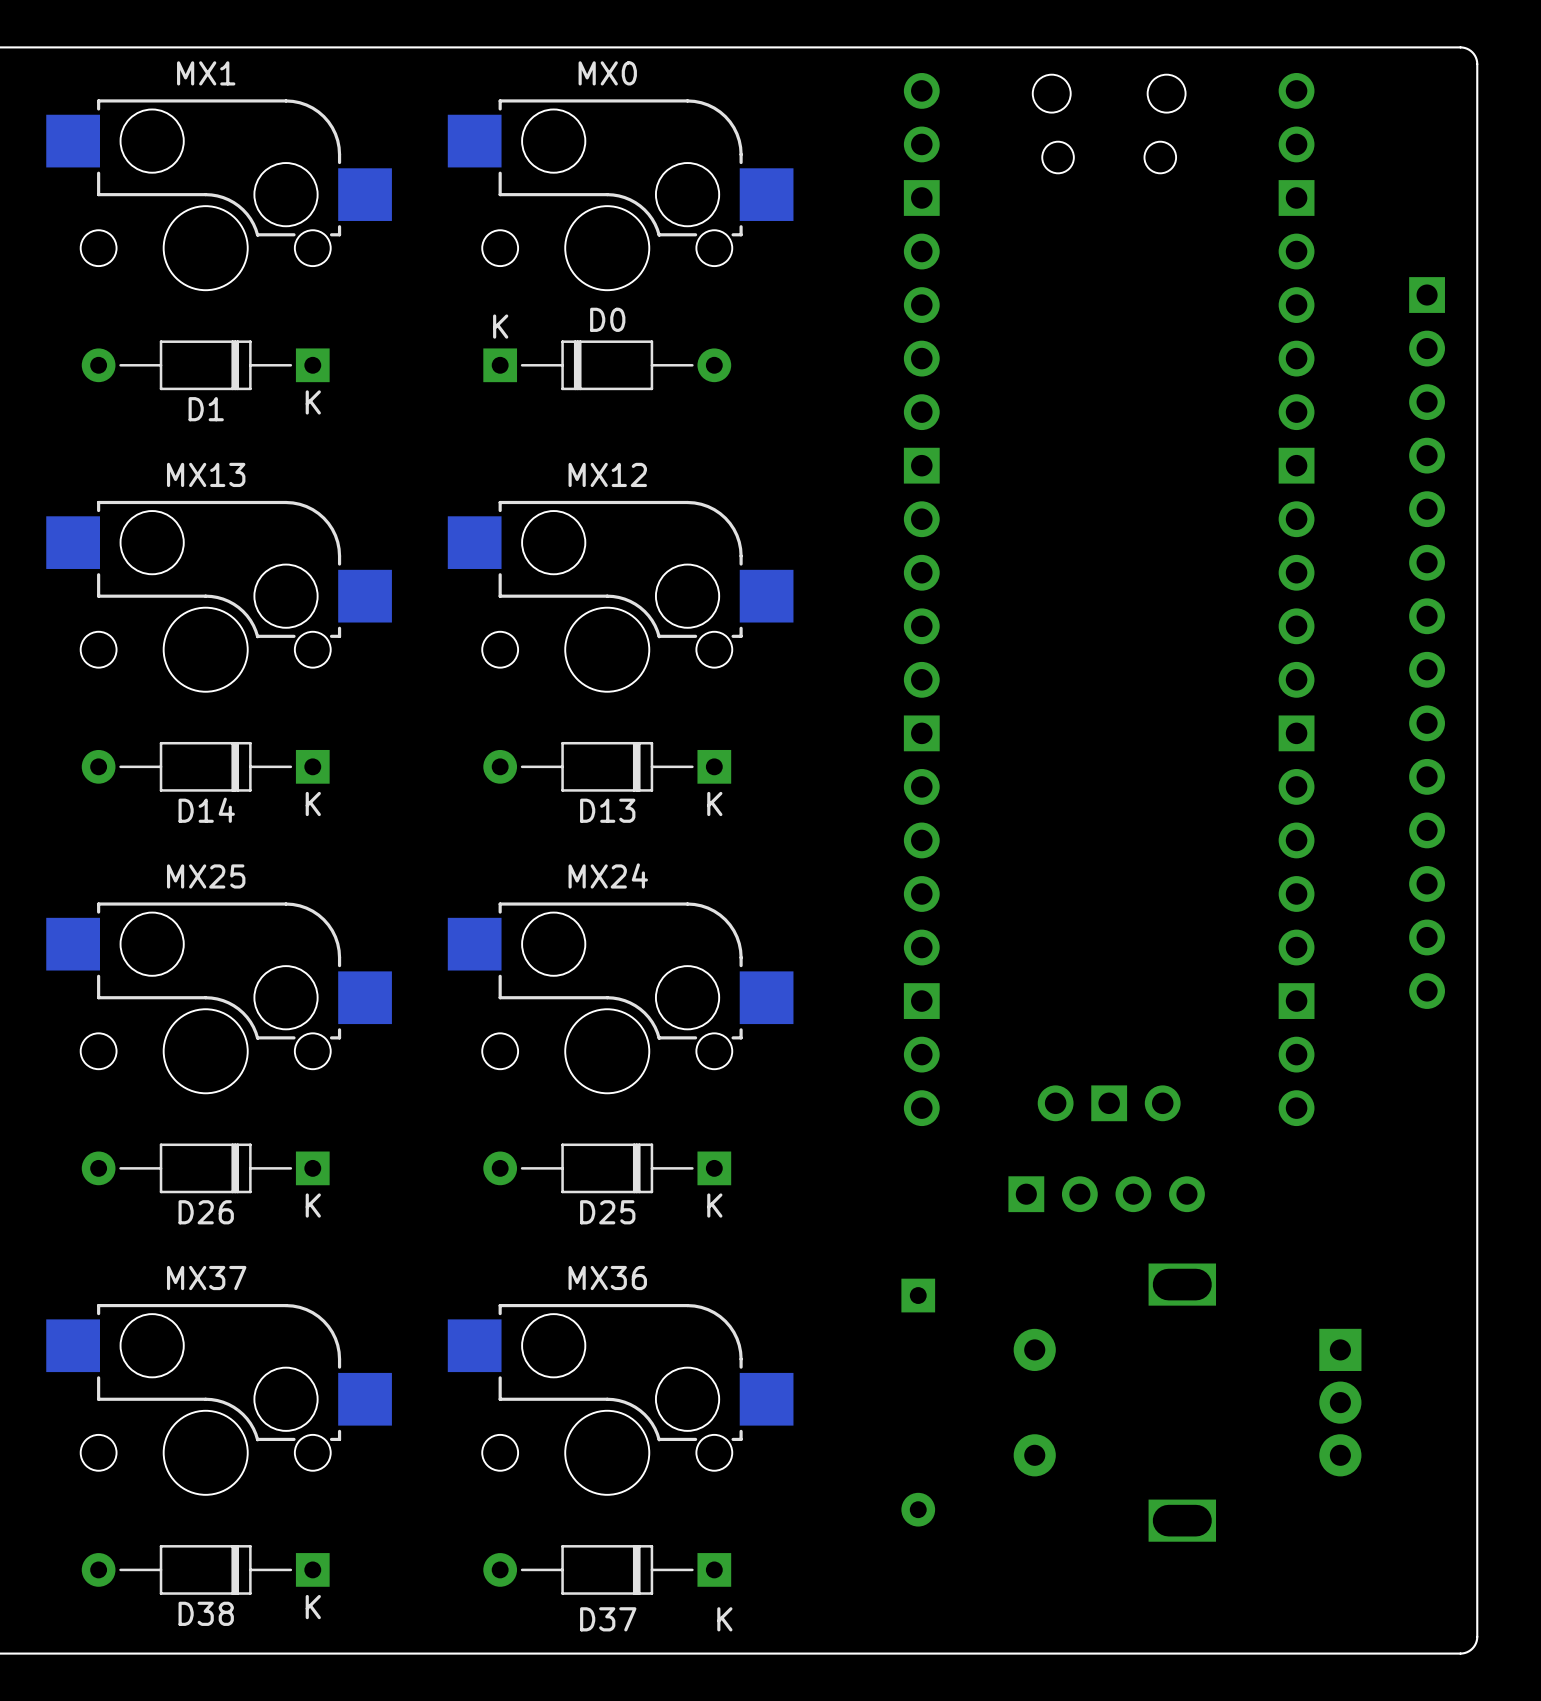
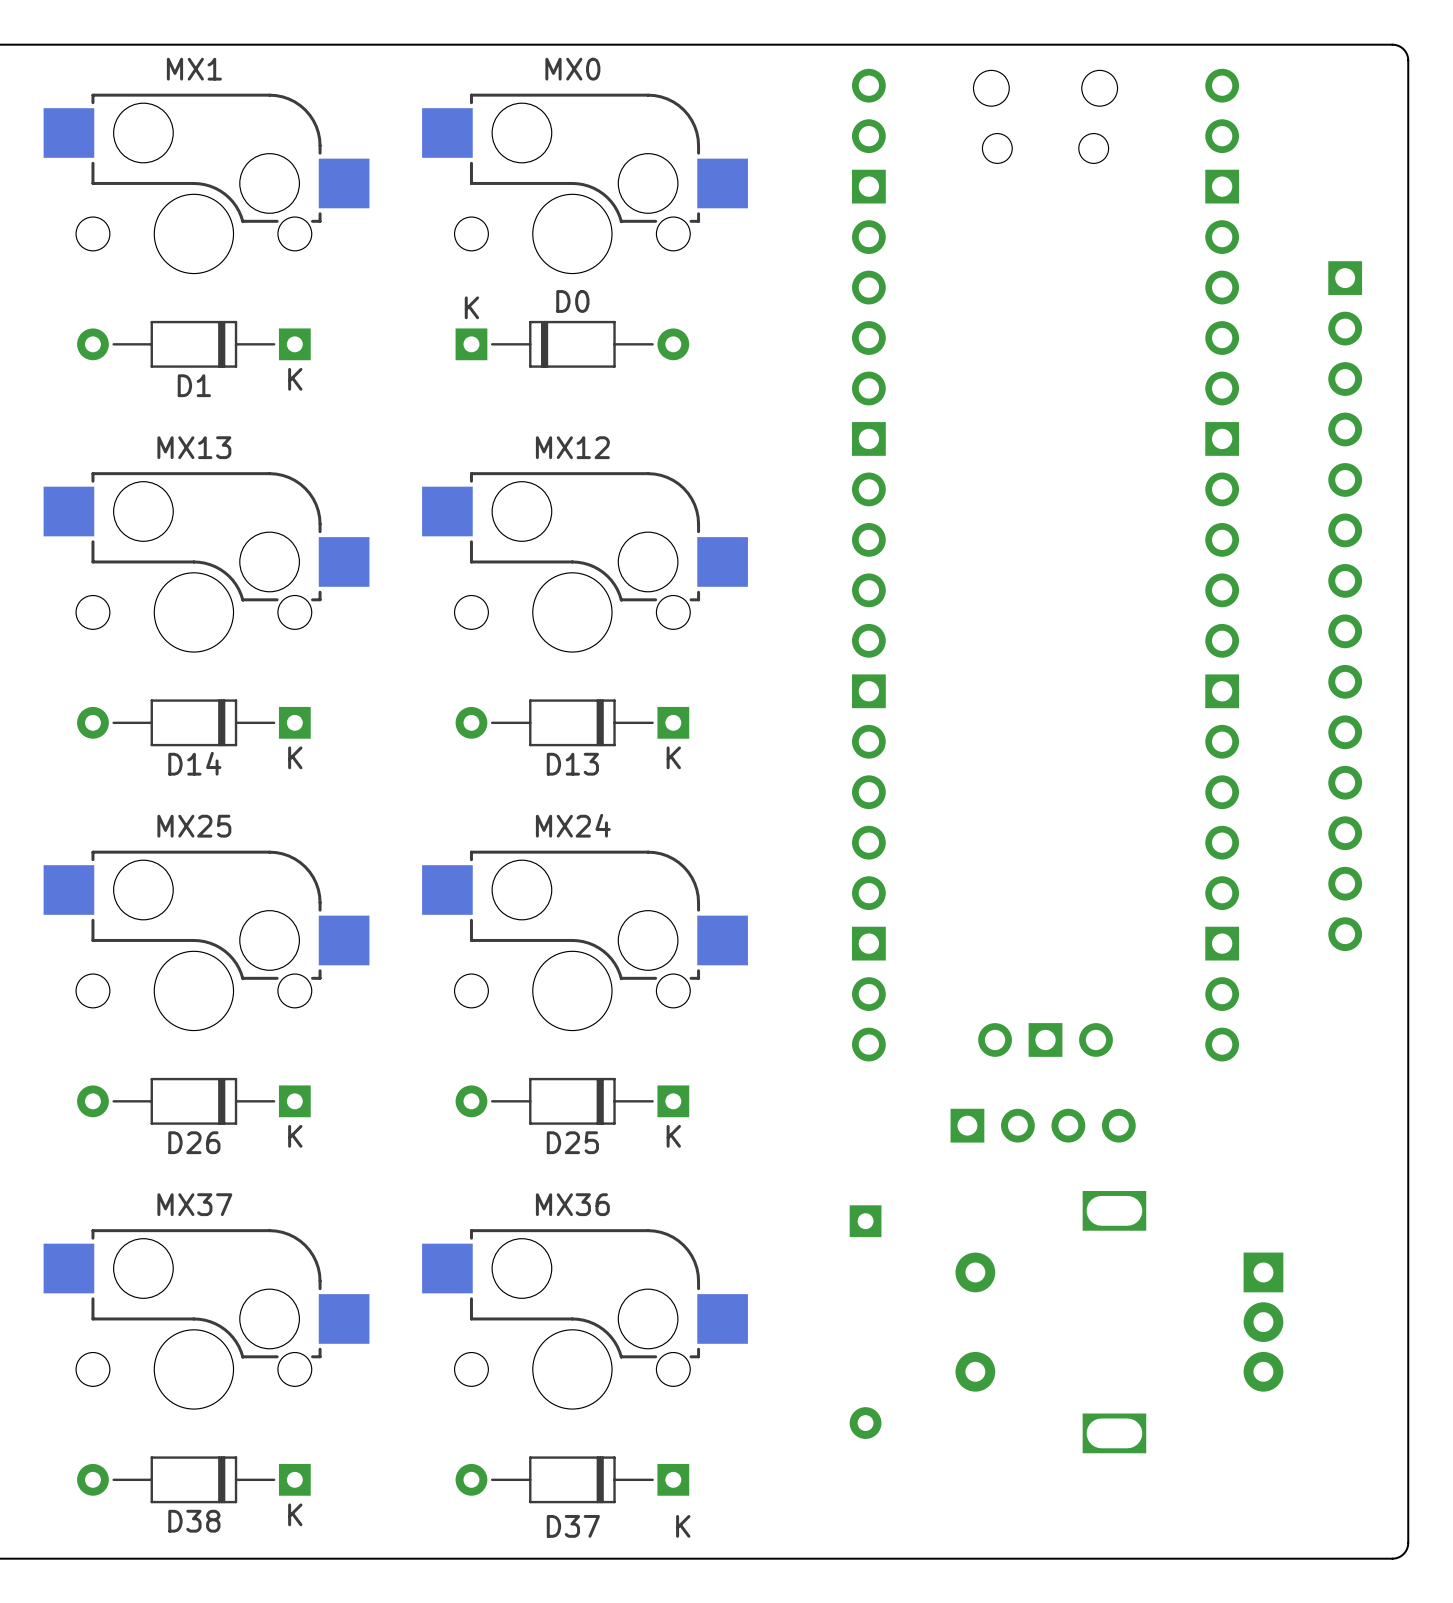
board edge: (1460, 47) (1472, 52) (1477, 64) (1477, 1636) (1472, 1648) (1460, 1653) -> (1376, 44) (1400, 46) (1406, 52) (1408, 60) (1408, 1542) (1406, 1550) (1400, 1556) (1376, 1558)

